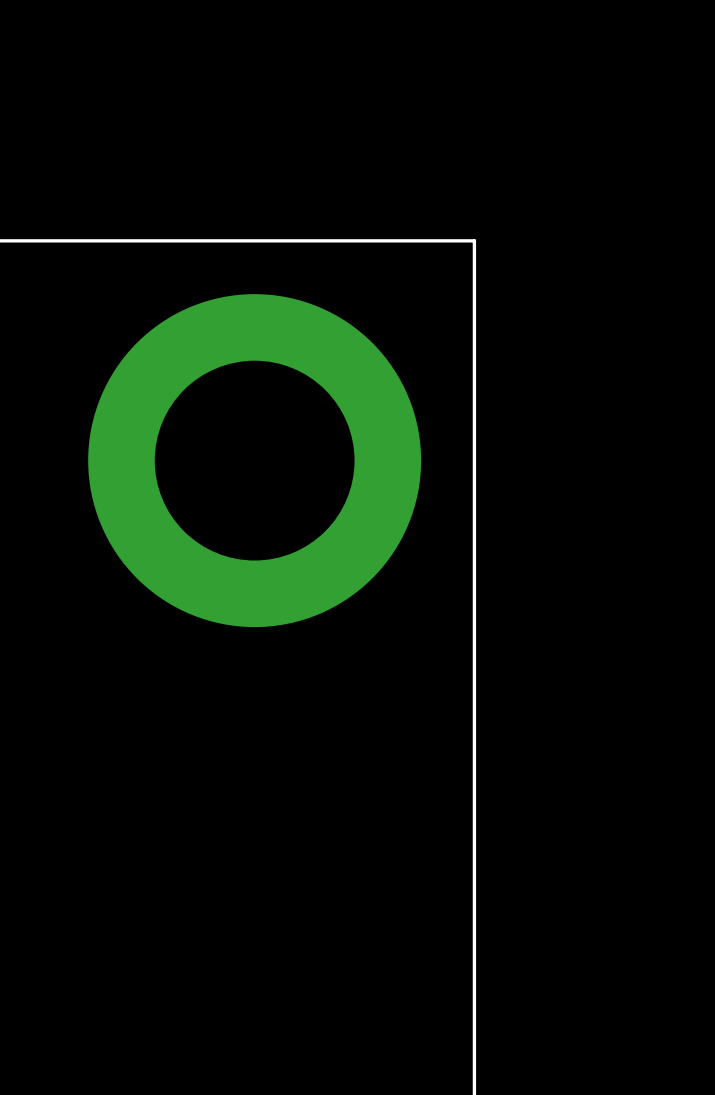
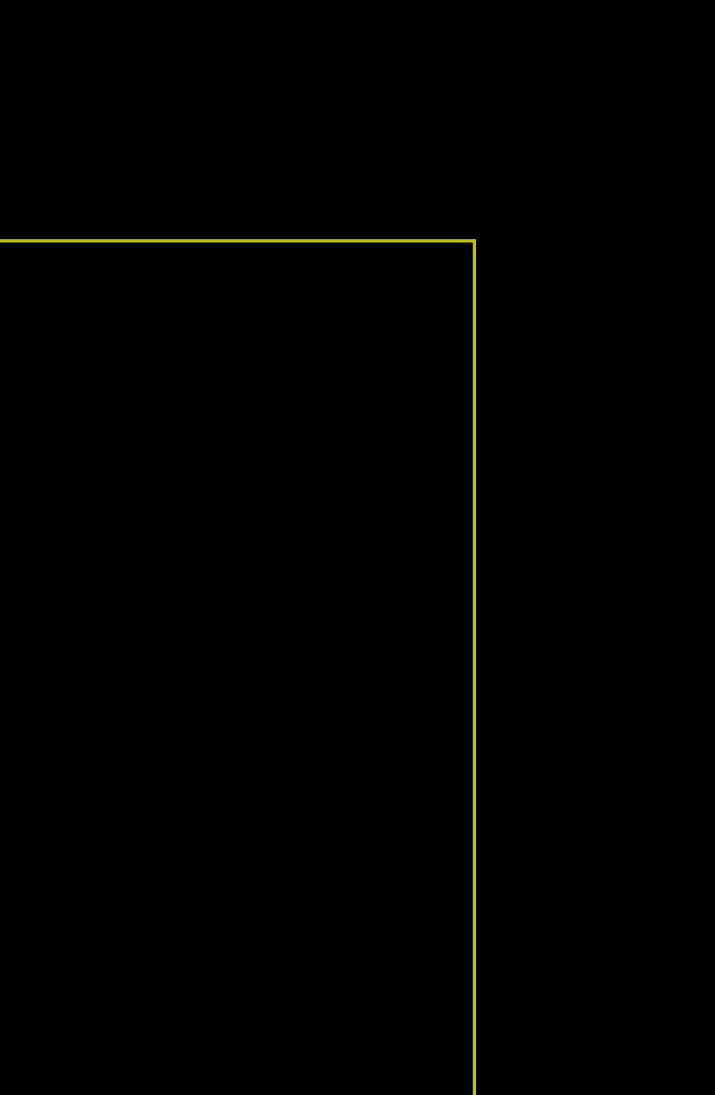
part: (254, 460) -> none

